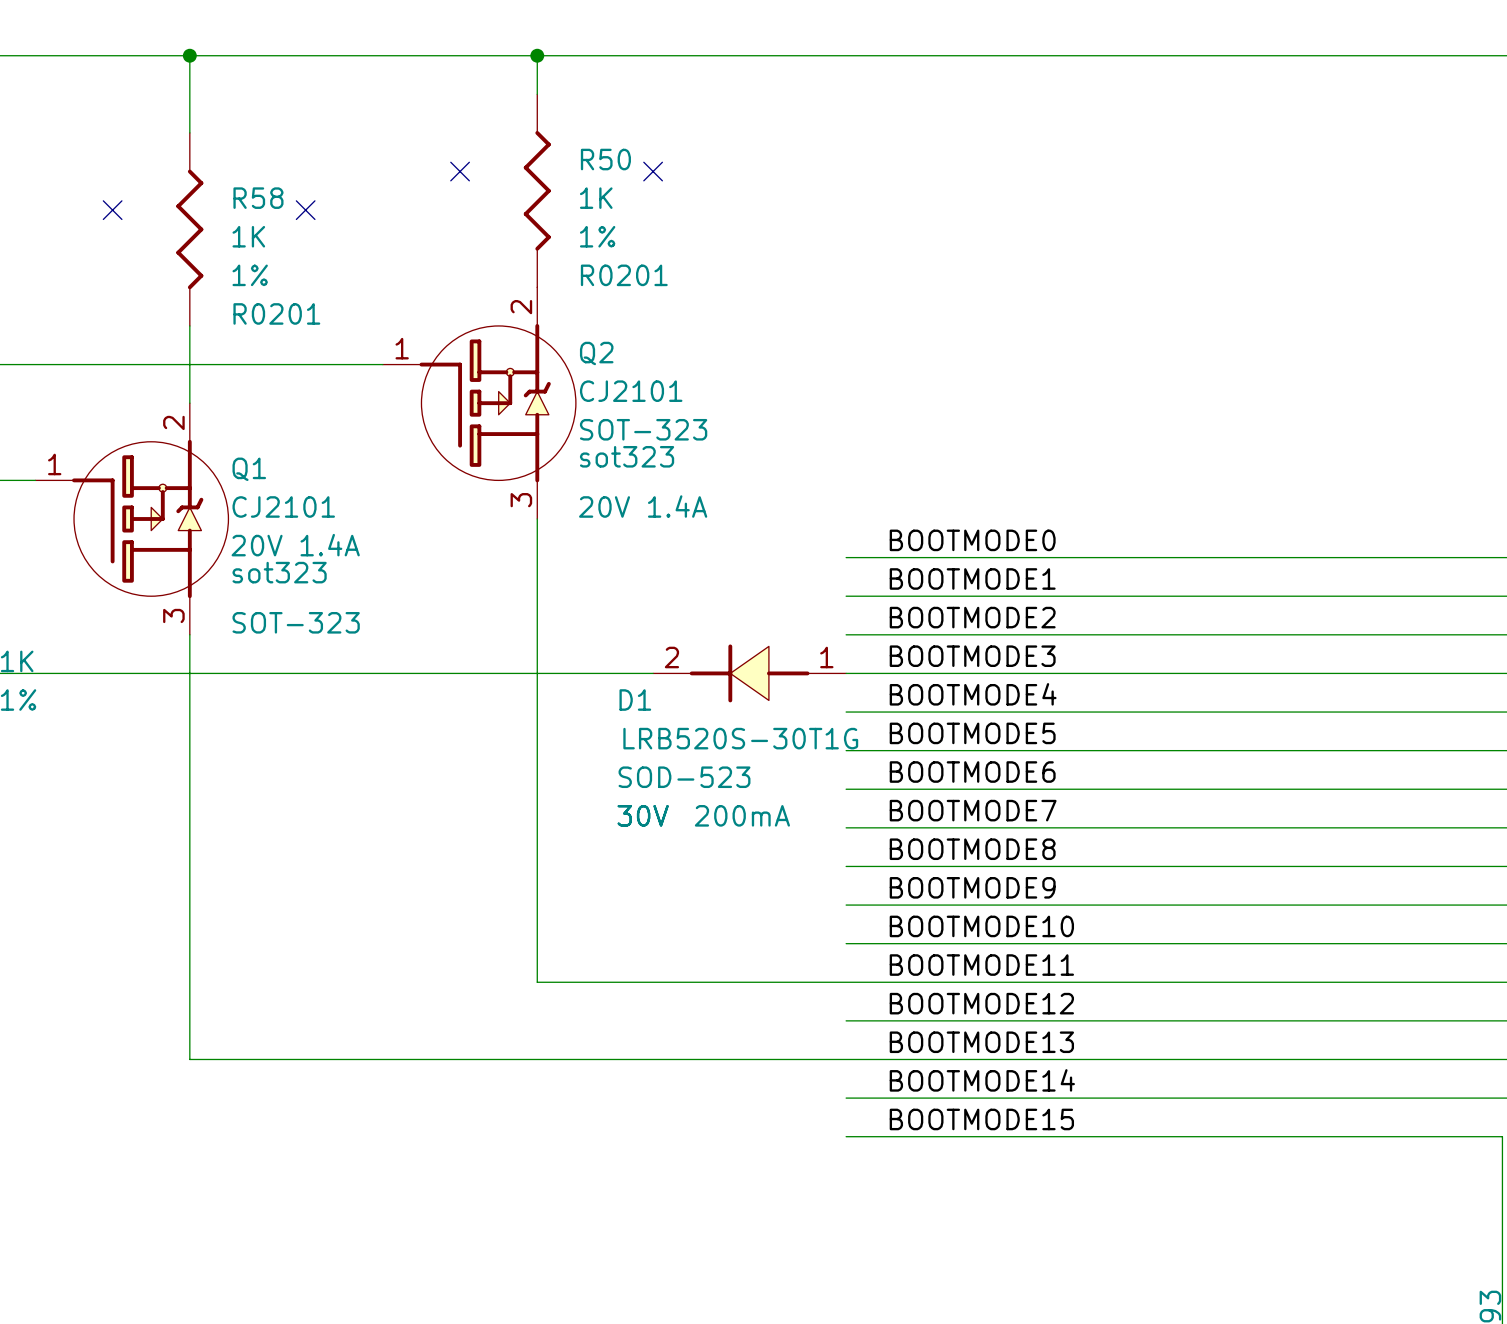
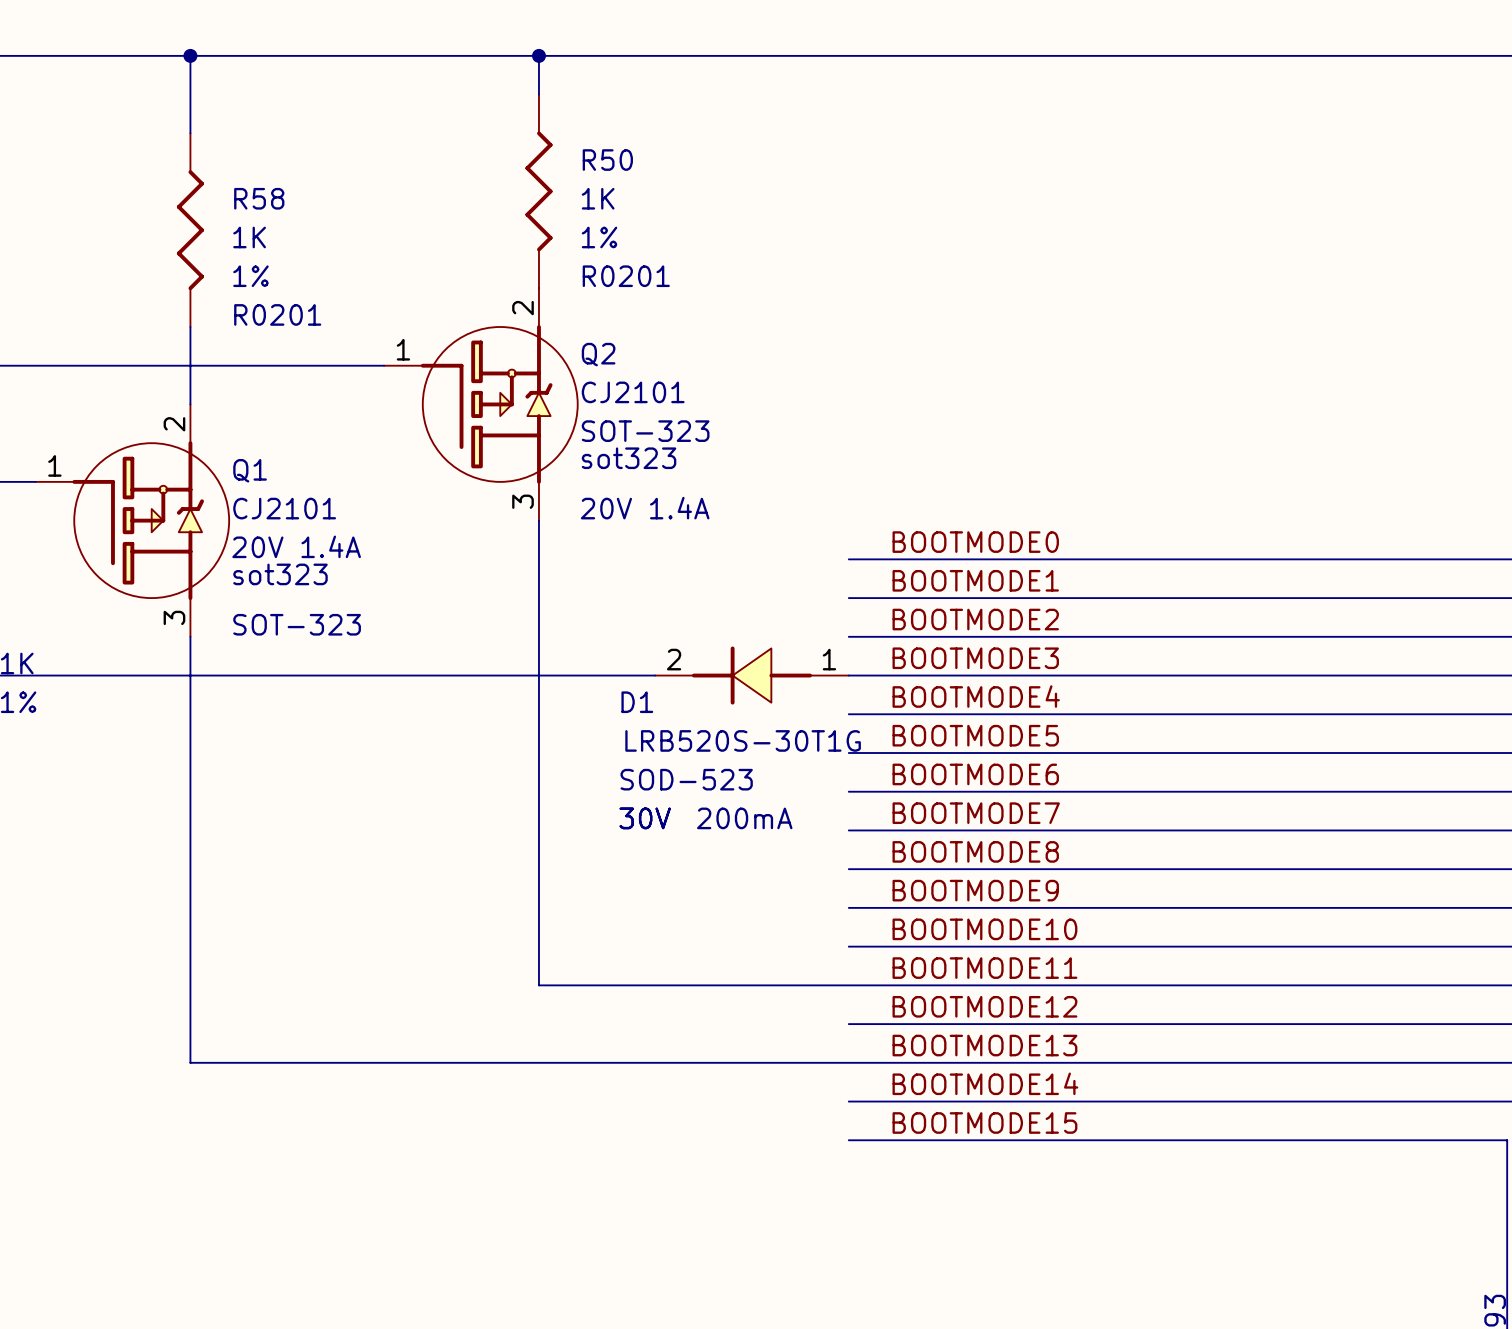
no-connect mark: (460, 171) -> none
no-connect mark: (653, 171) -> none
no-connect mark: (112, 210) -> none
no-connect mark: (305, 210) -> none

